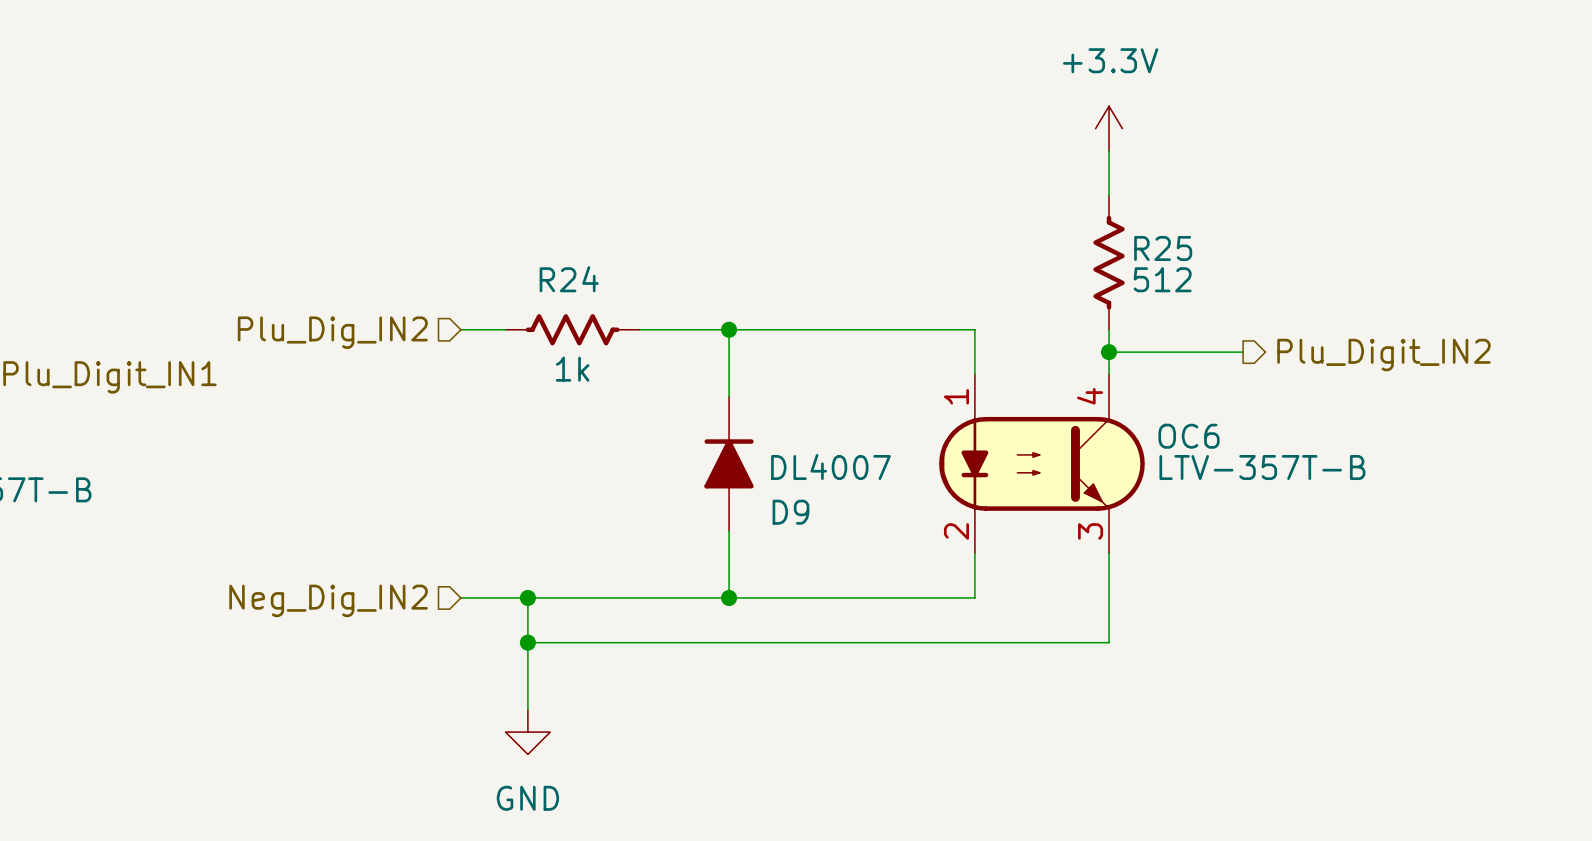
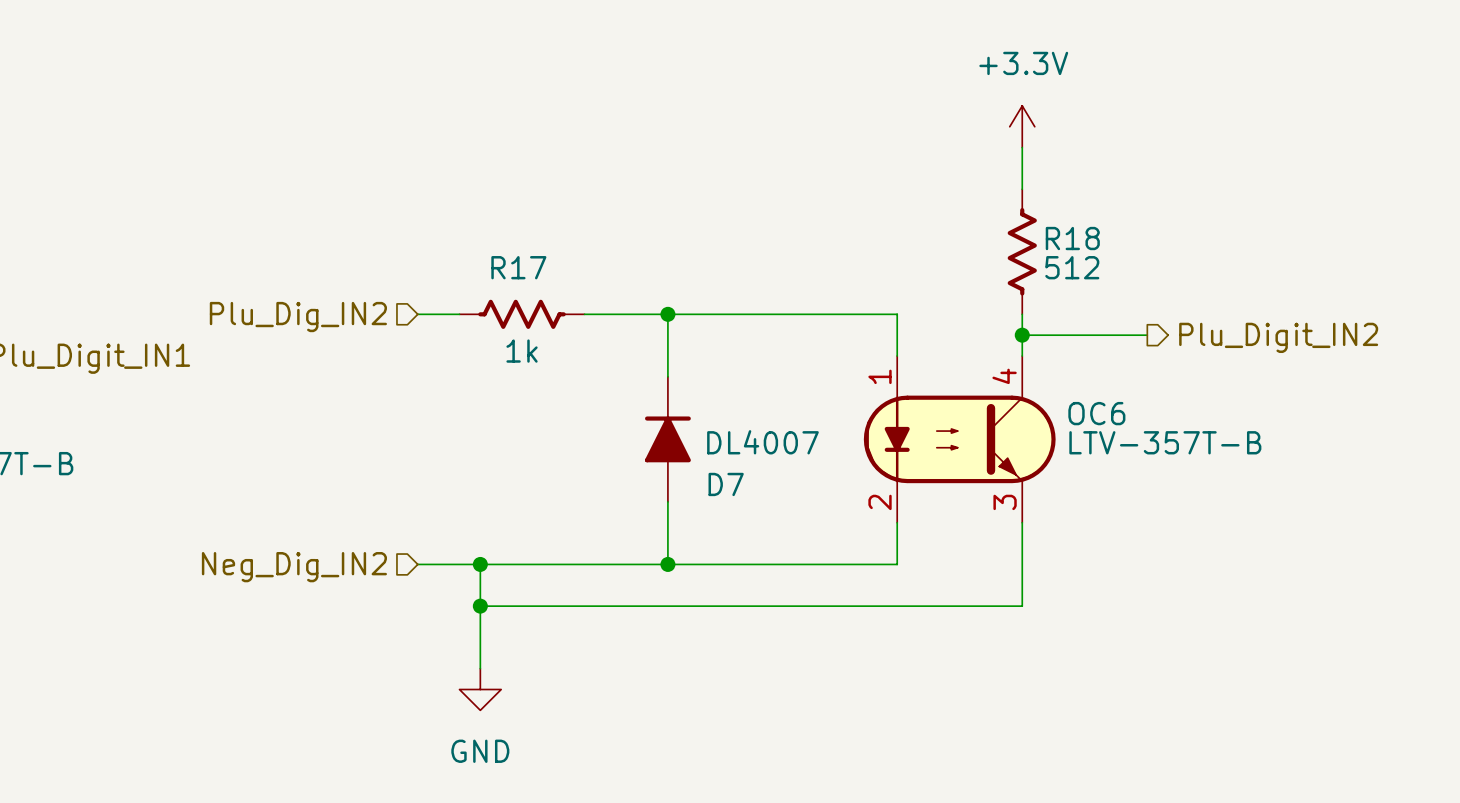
R25 name: R25 (1163, 248) -> R18 (1072, 238)
R24 name: R24 (569, 279) -> R17 (518, 267)
D9 name: D9 (790, 512) -> D7 (726, 484)

